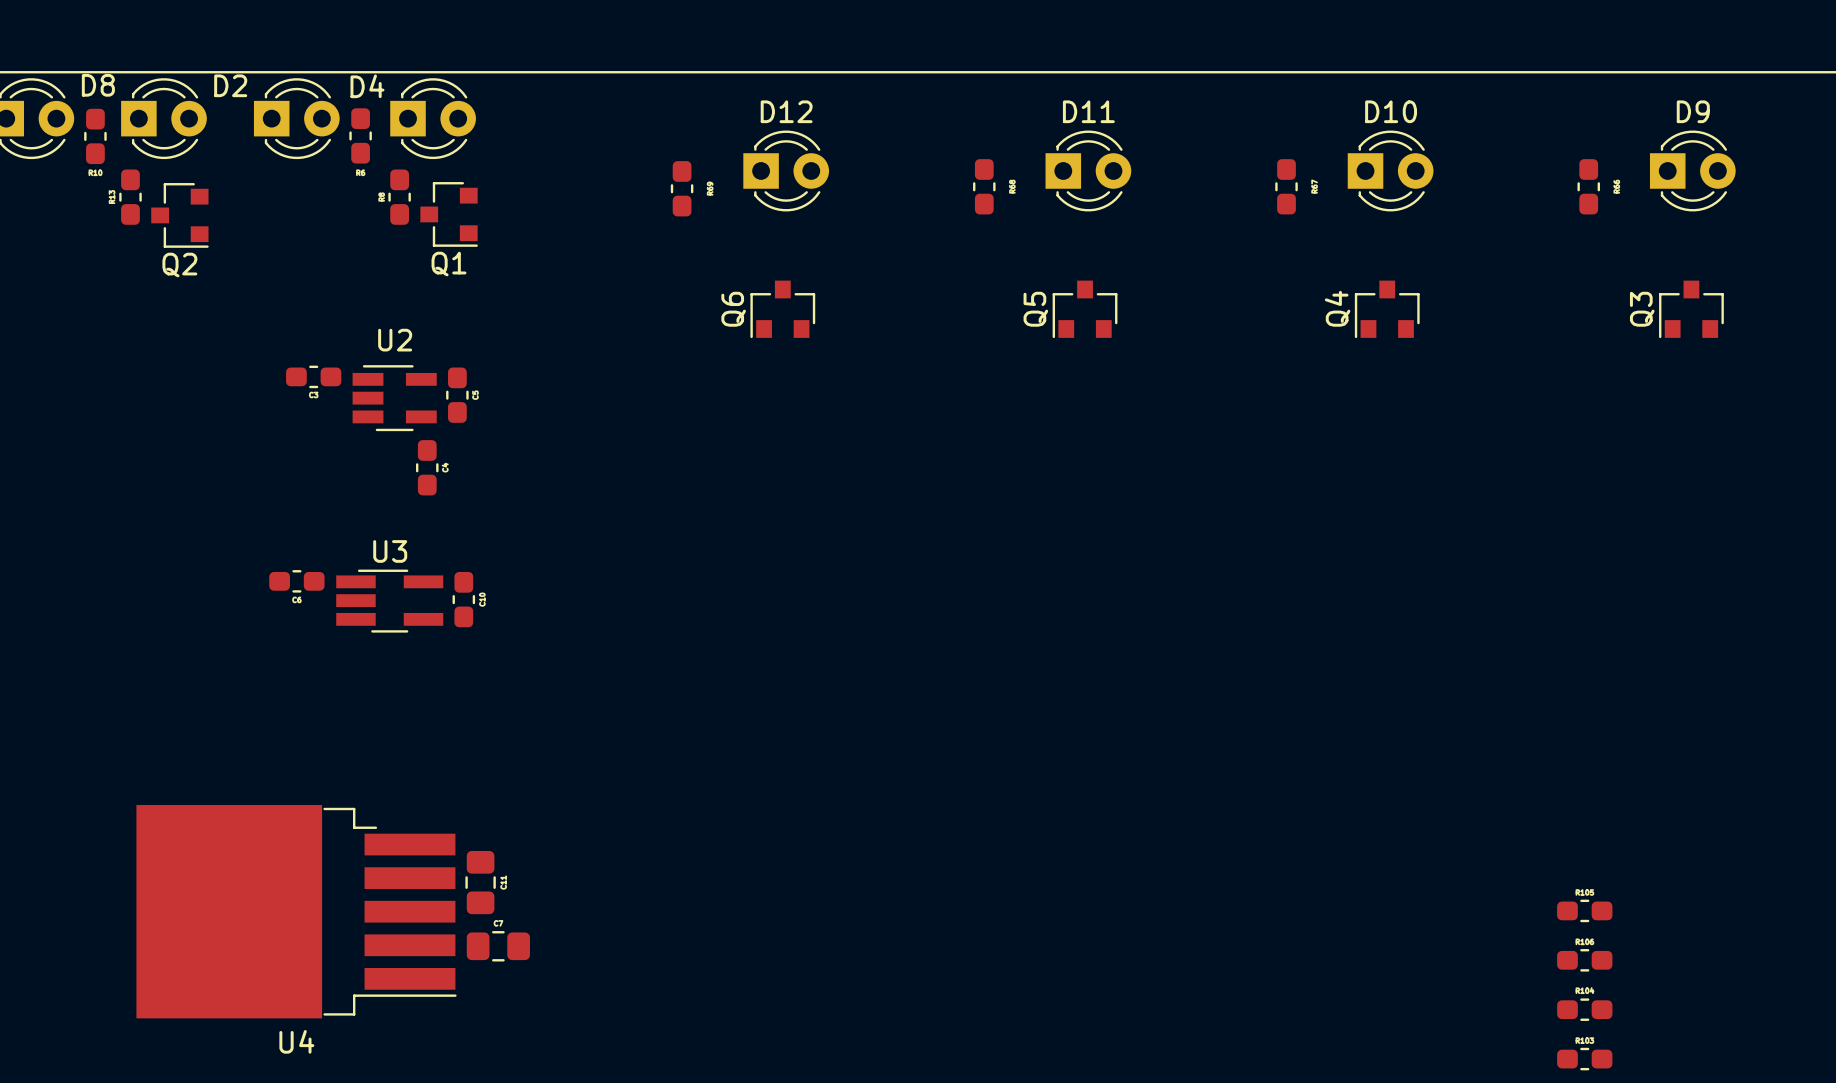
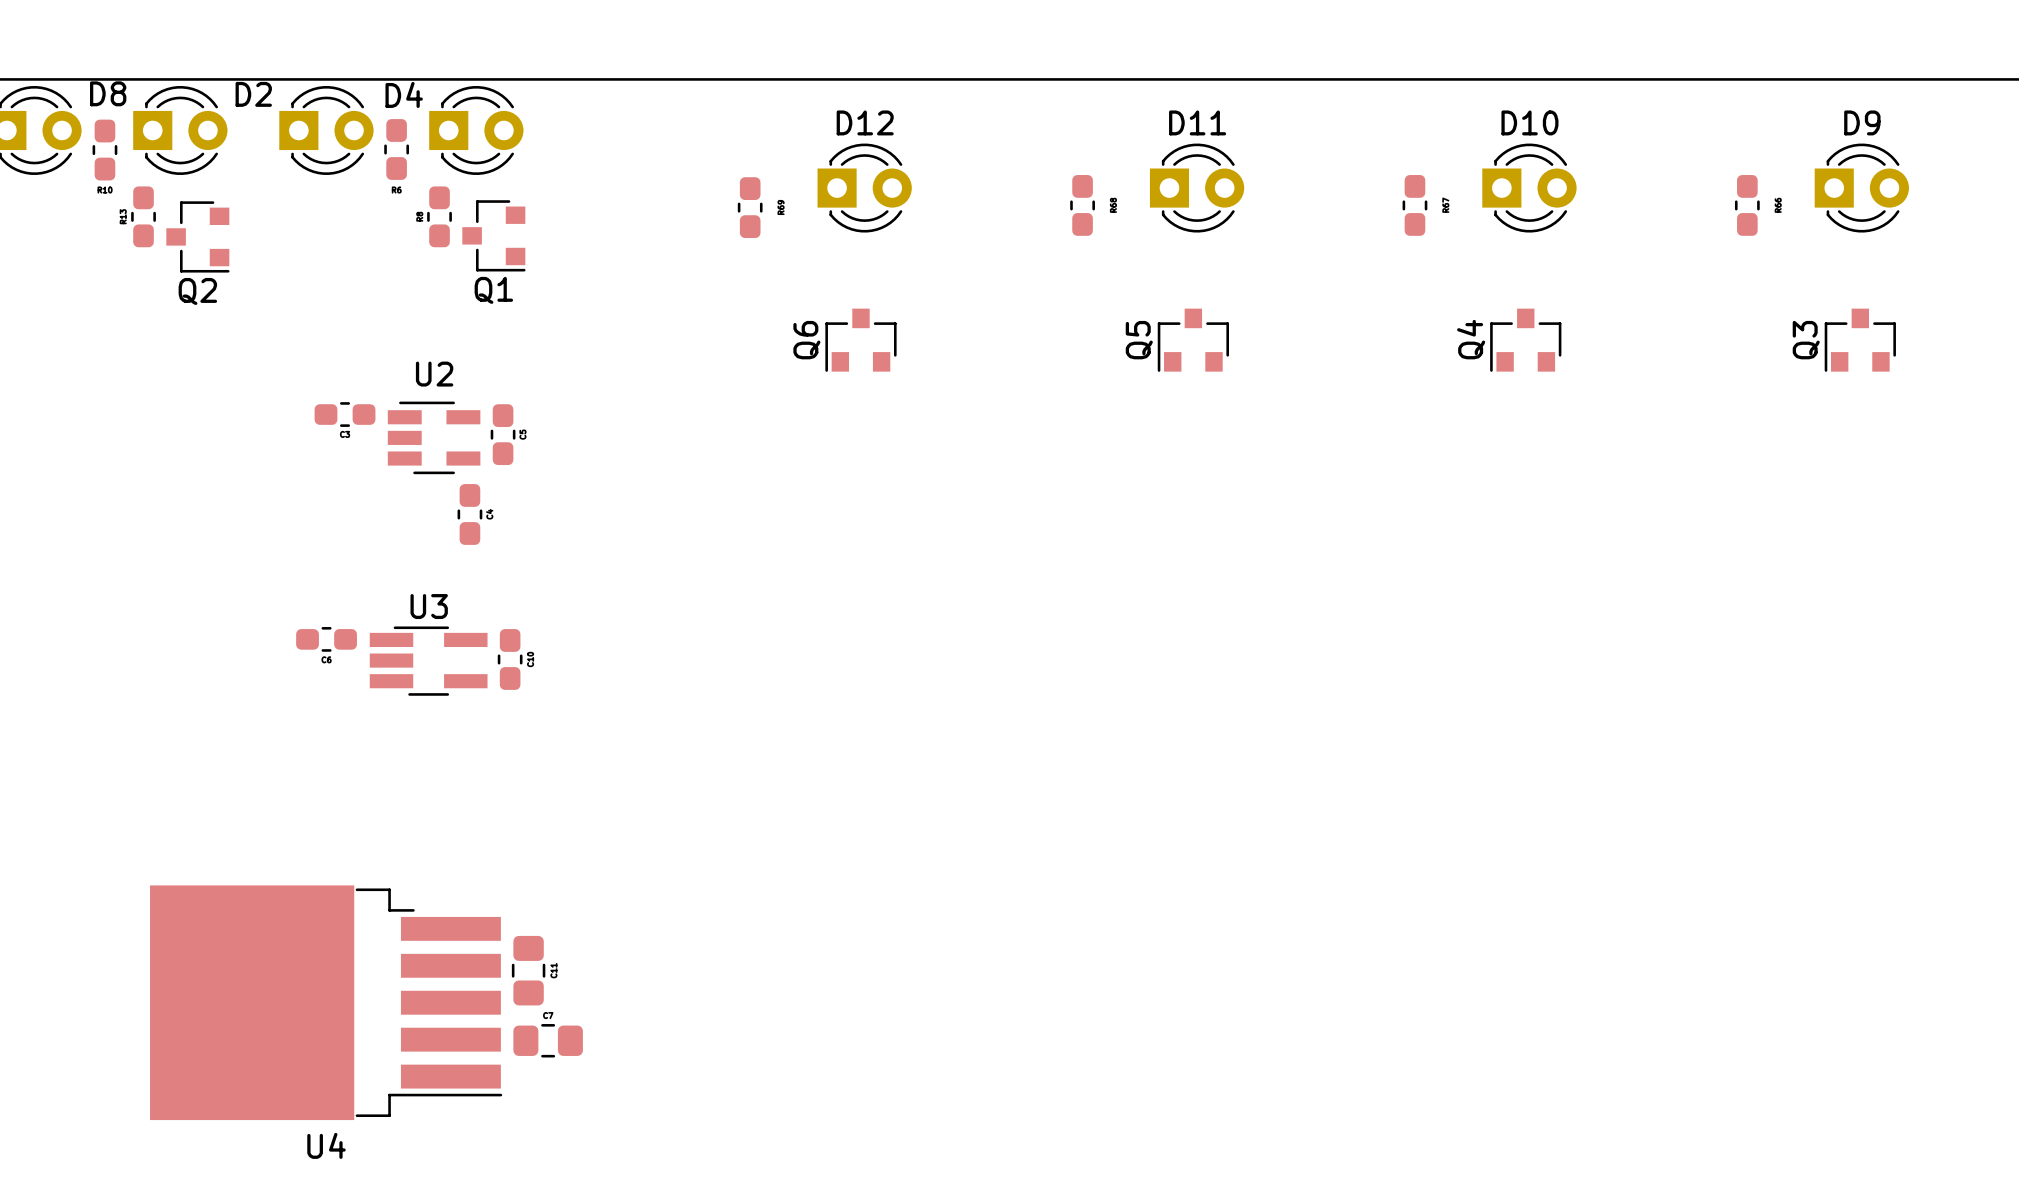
part: (1584, 910) -> none
part: (1584, 960) -> none
part: (1584, 1009) -> none
part: (1584, 1059) -> none

